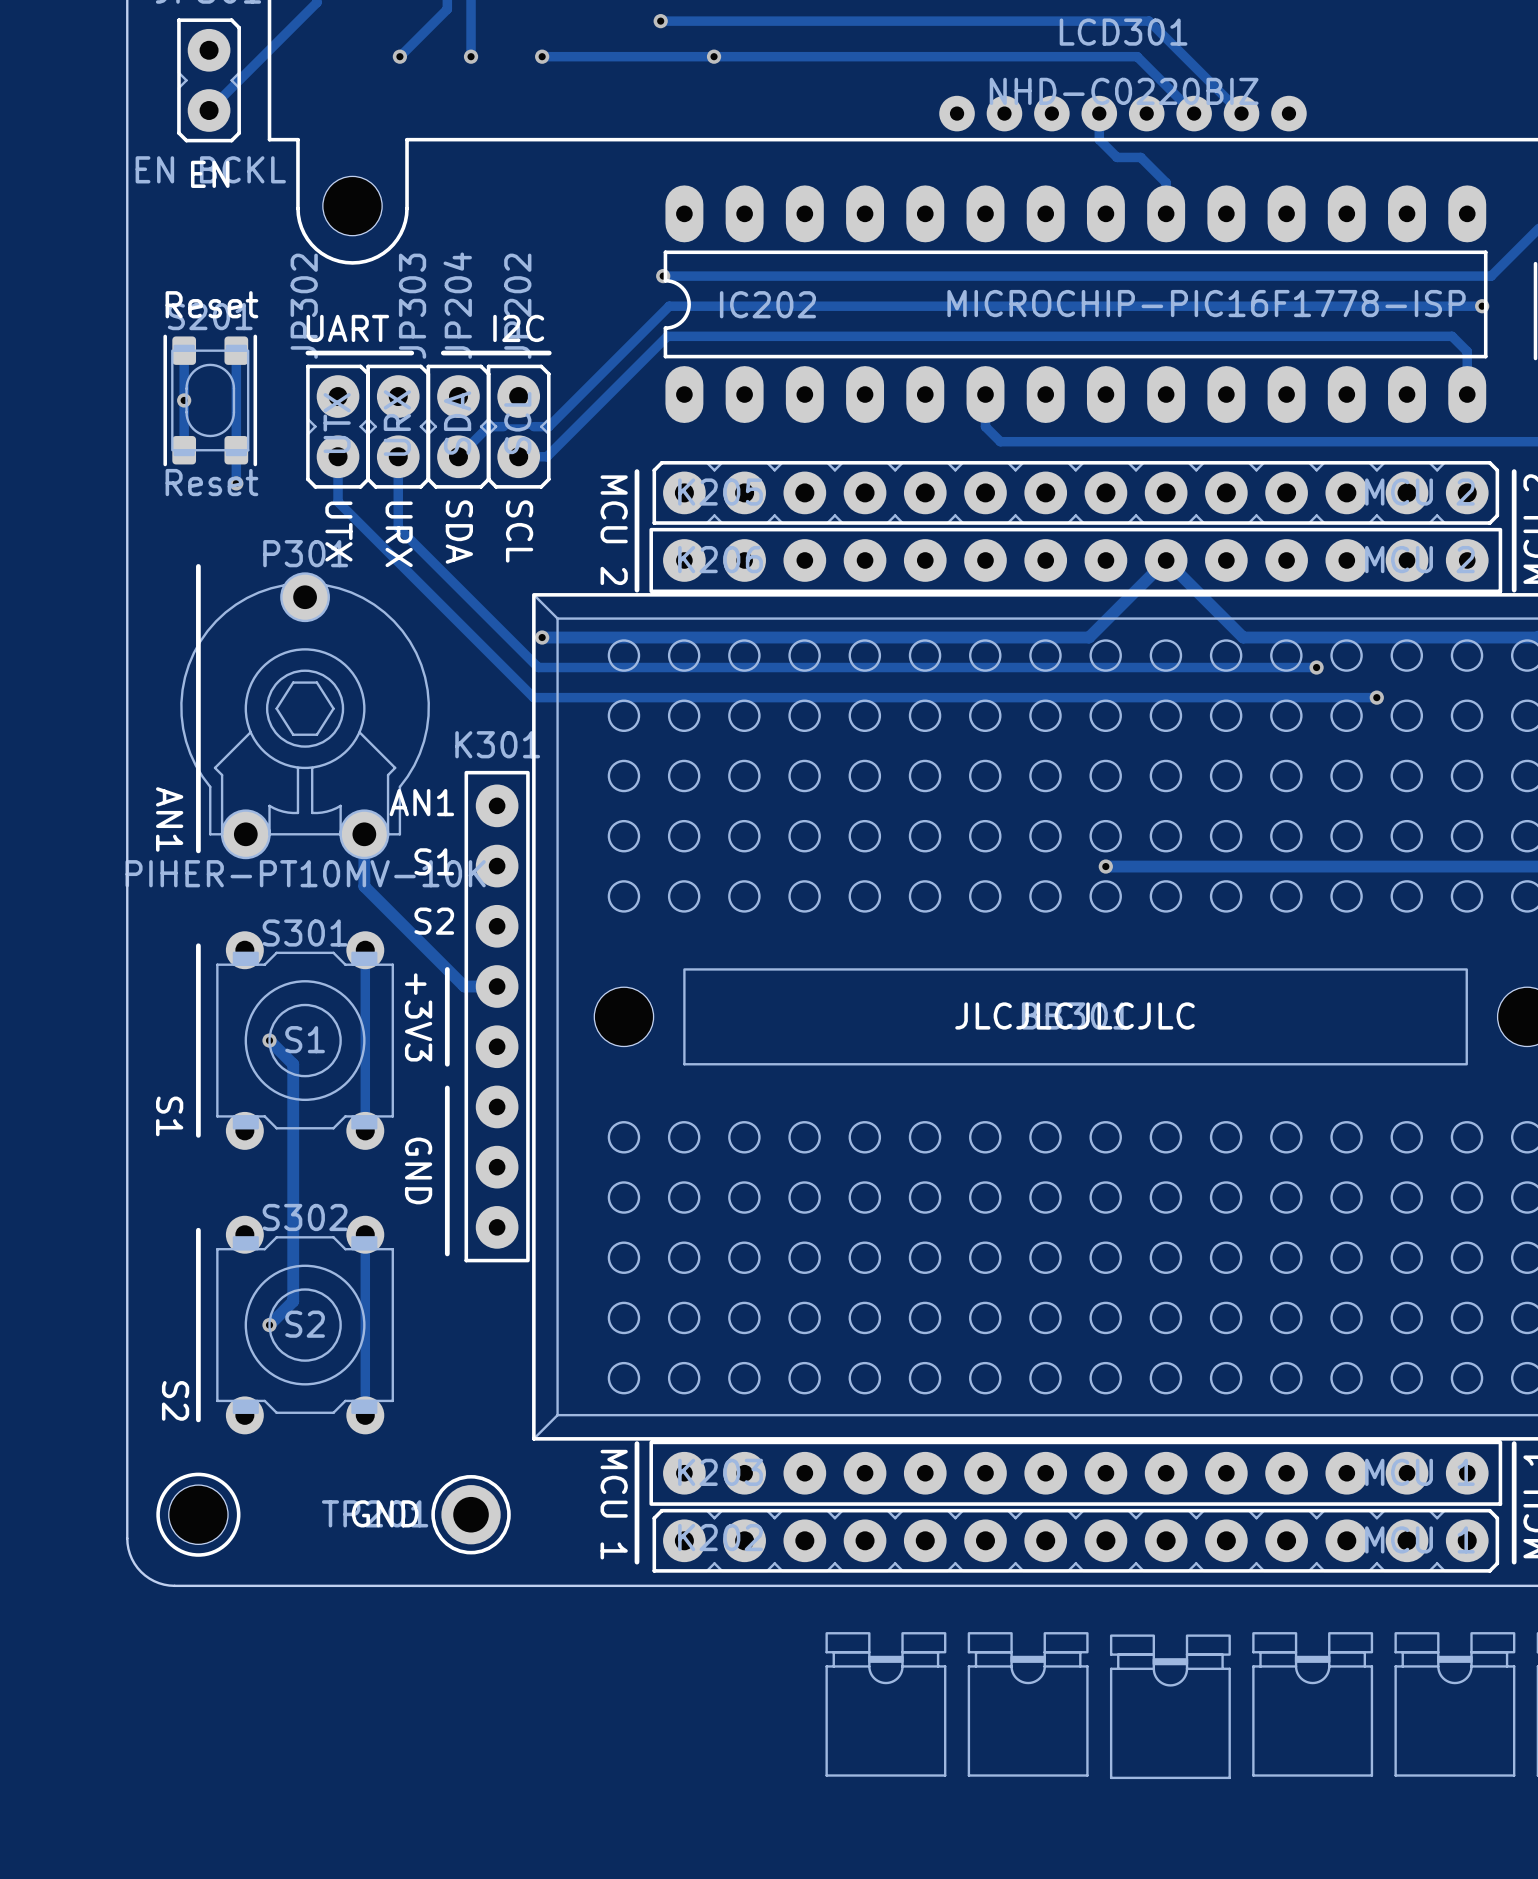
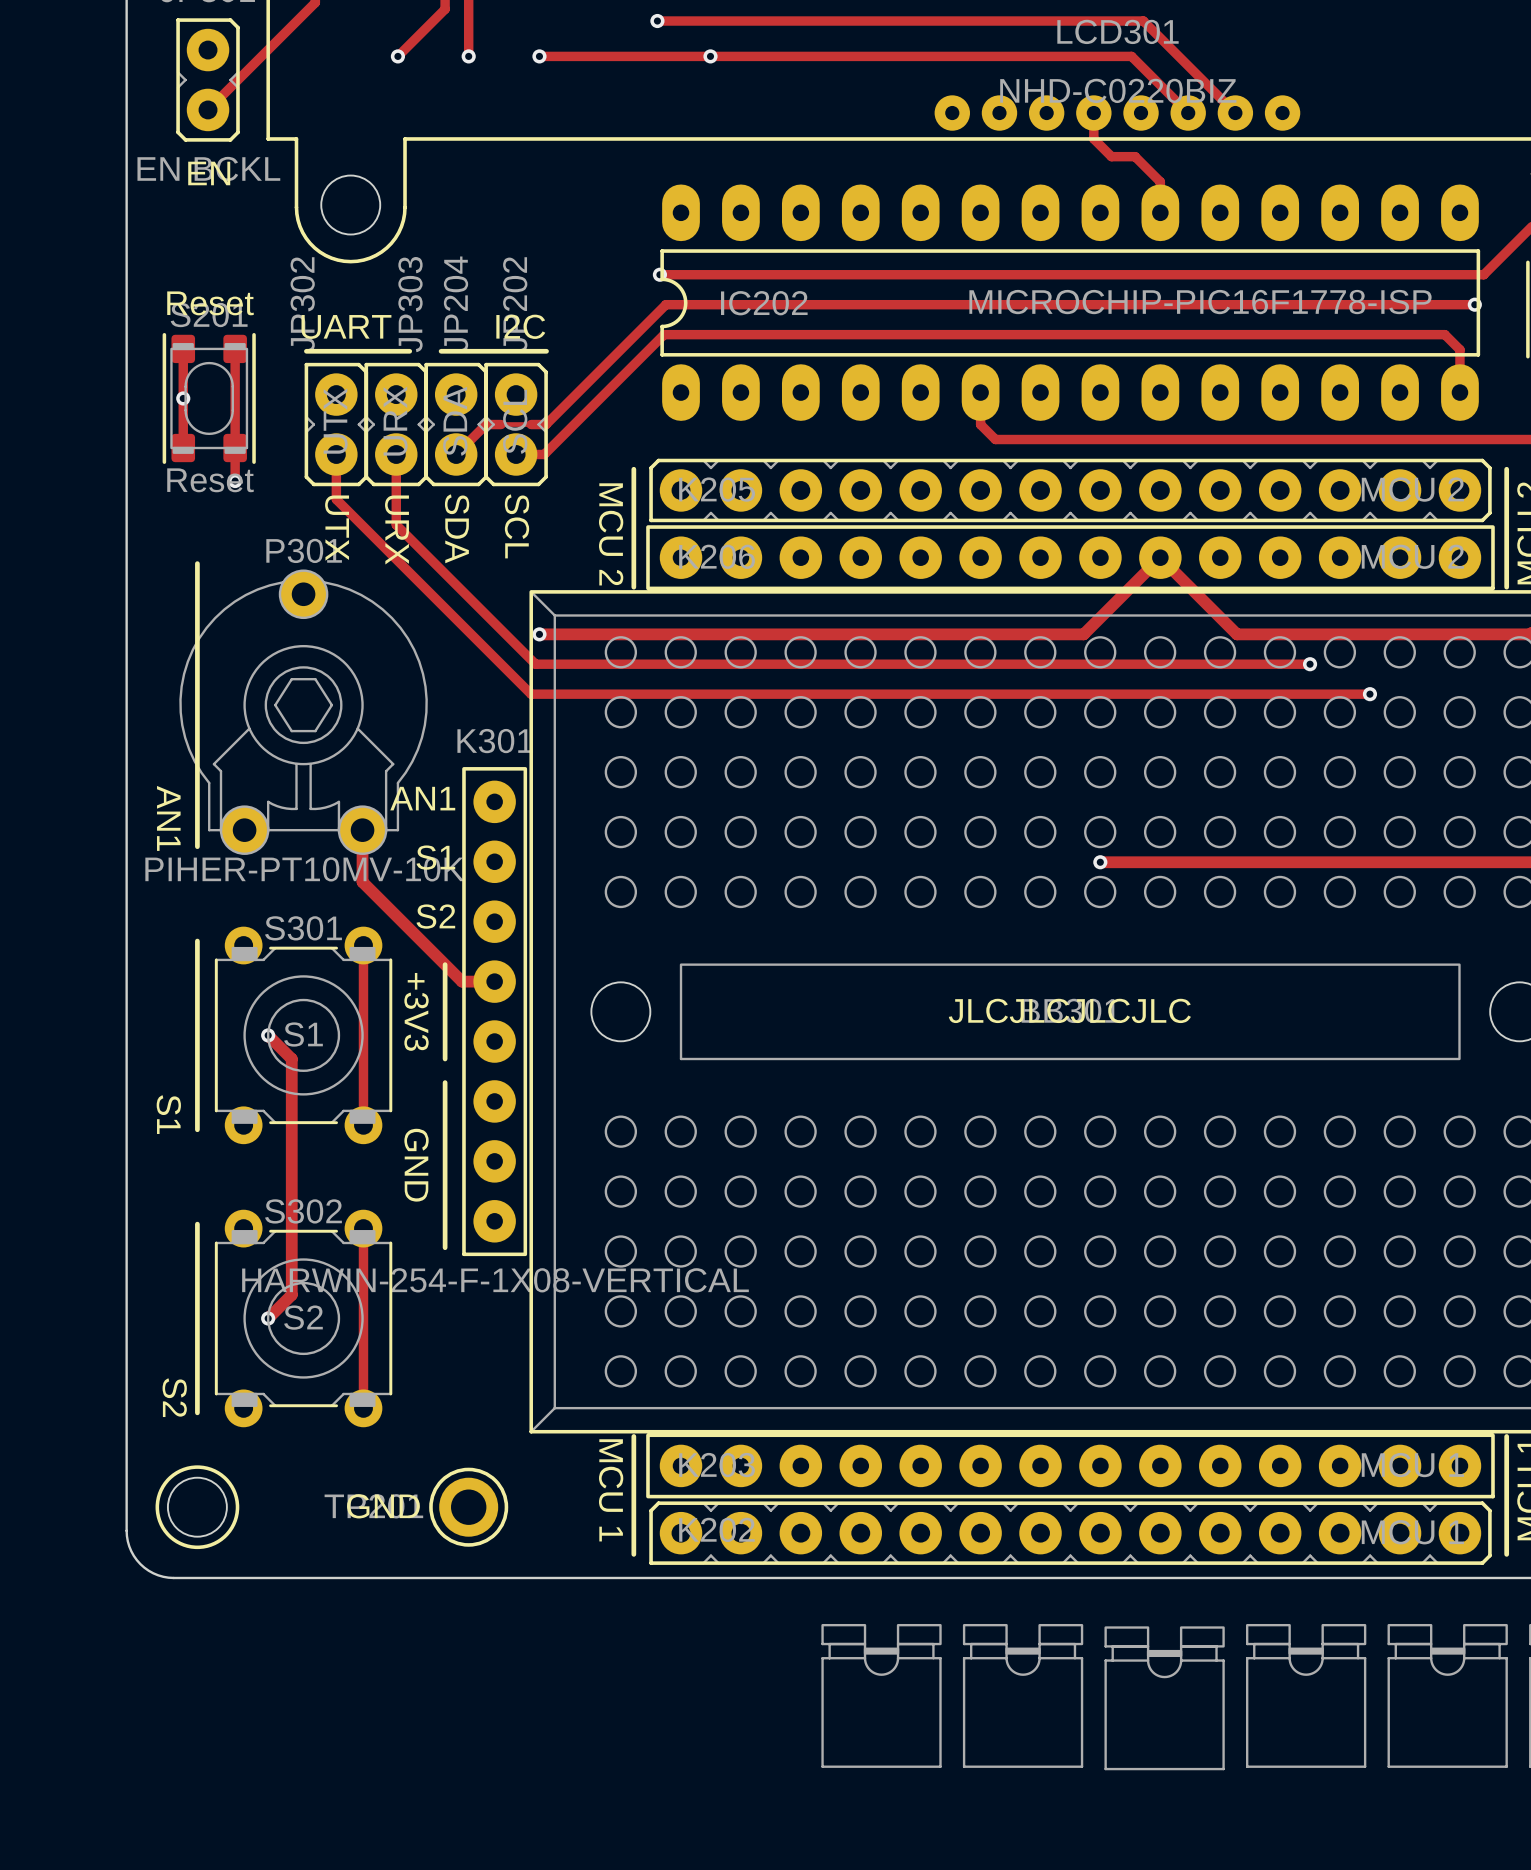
S301 footprint: [216, 931, 394, 1150] -> [214, 926, 393, 1145]
S302 footprint: [216, 1215, 394, 1435] -> [214, 1209, 393, 1428]
K301 value: none -> HARWIN-254-F-1X08-VERTICAL (495, 1280)

